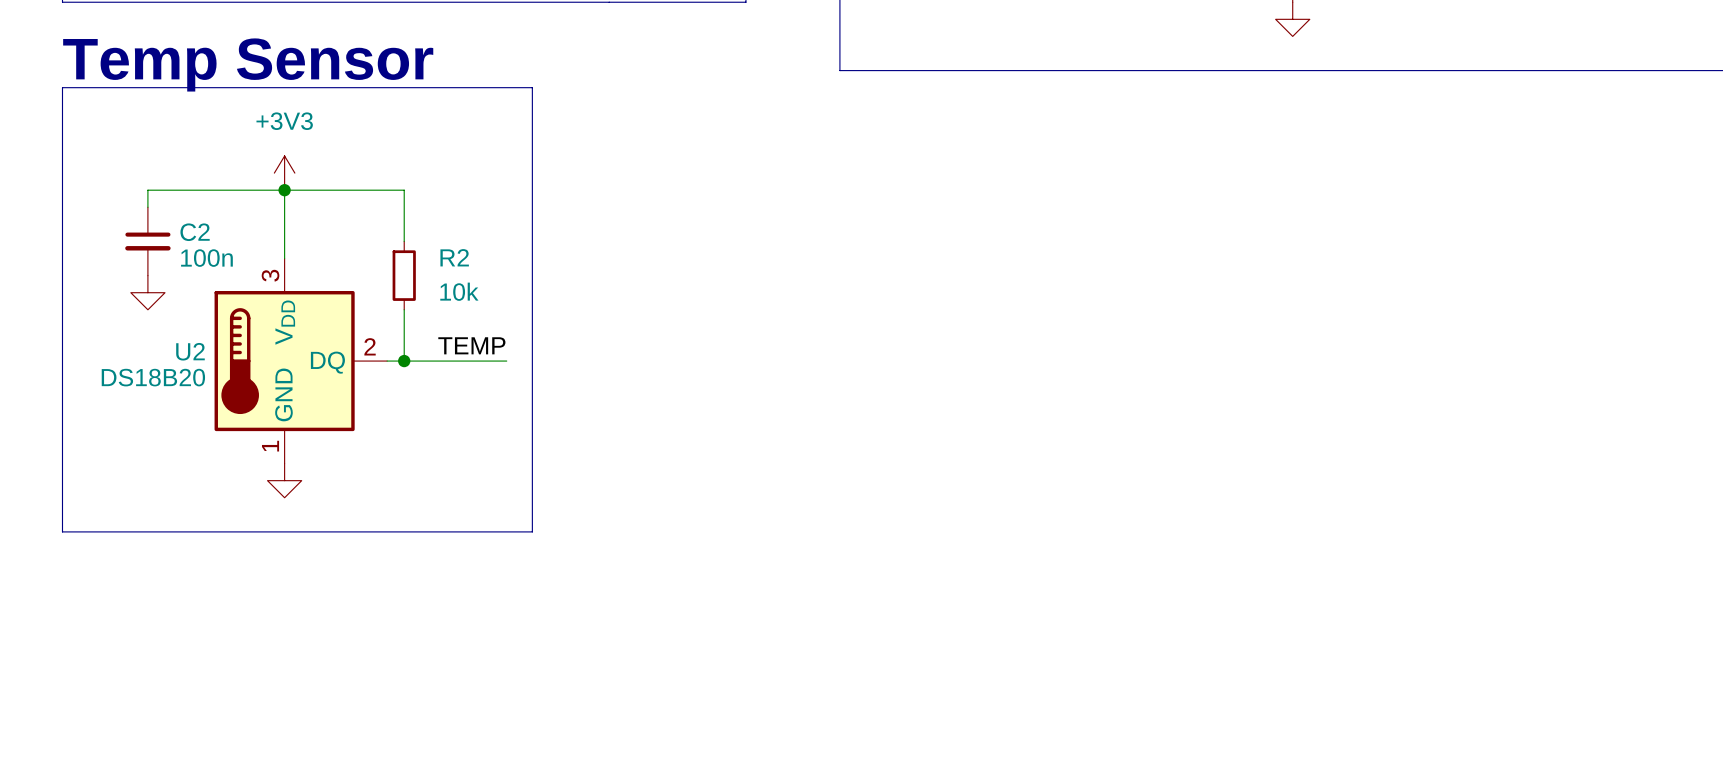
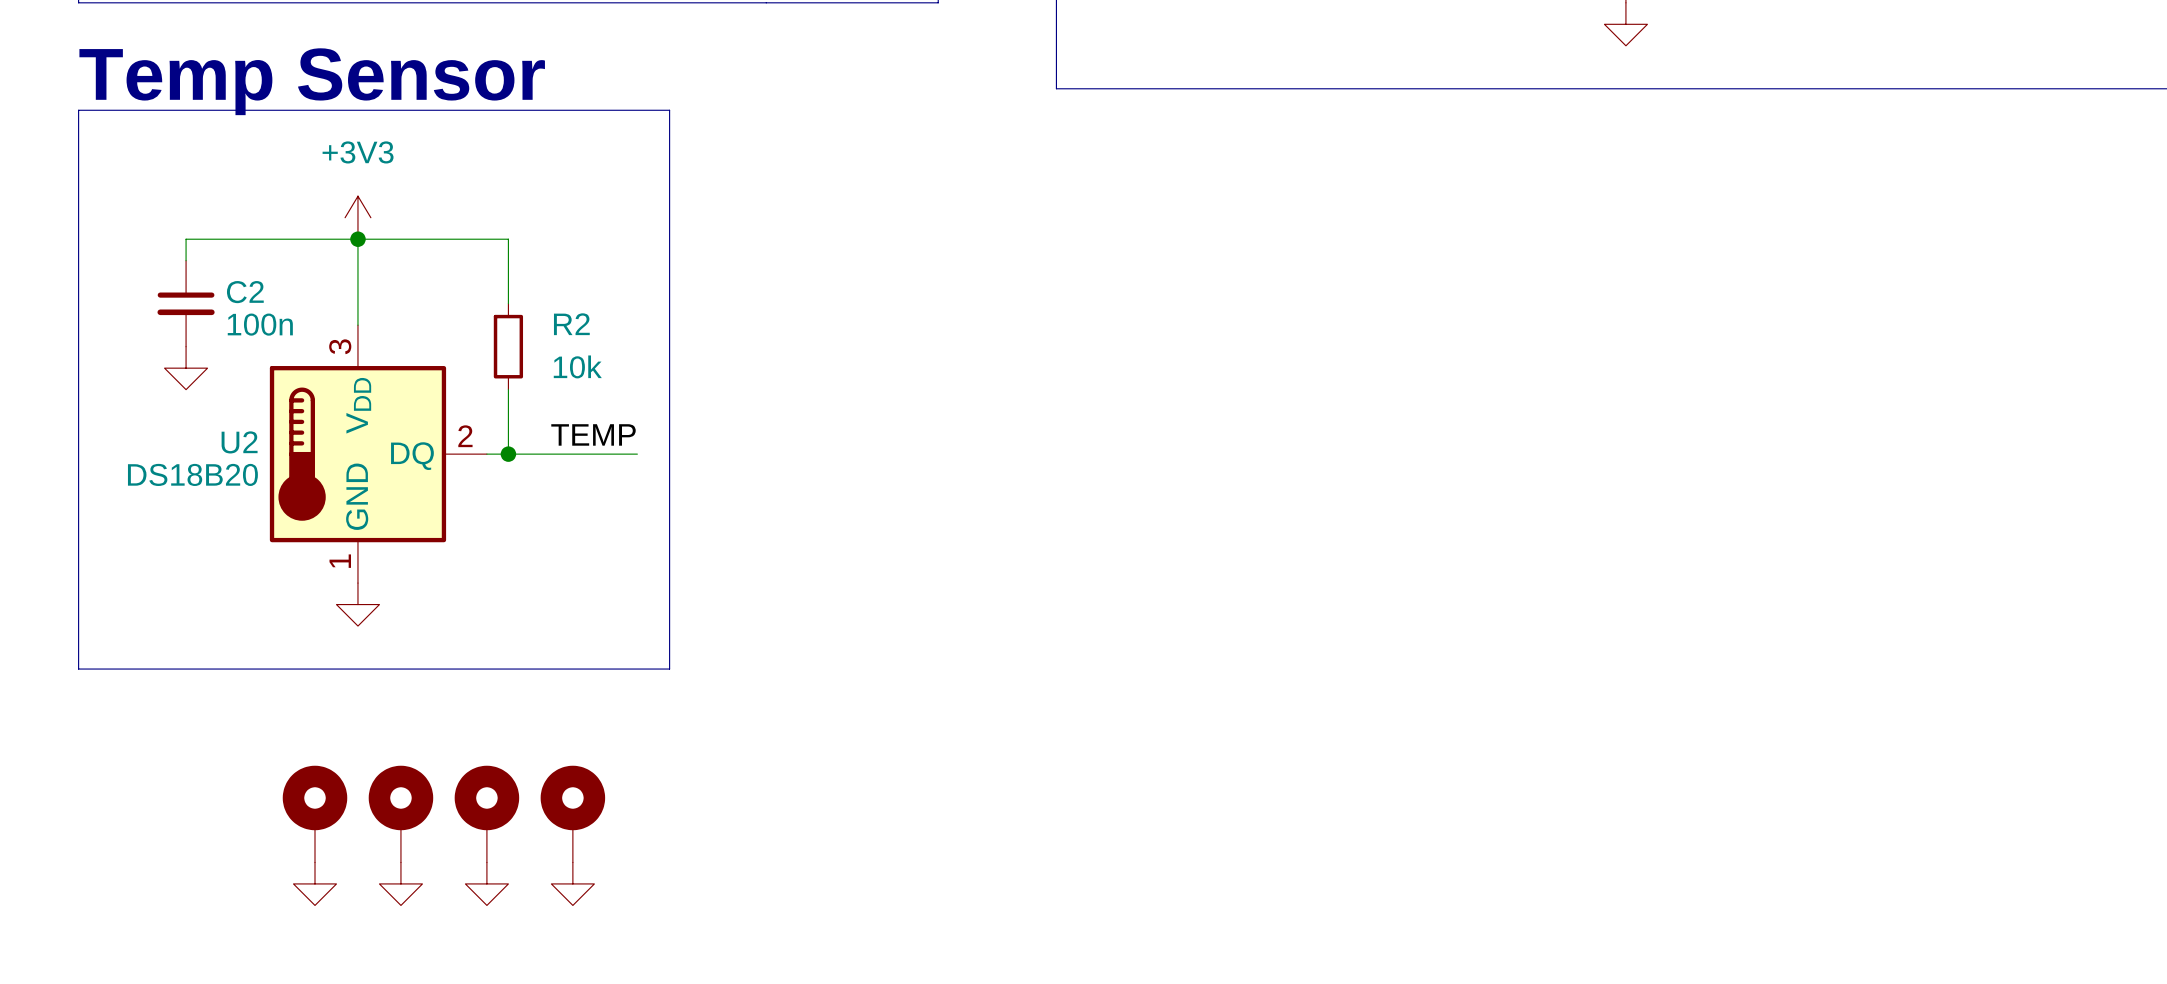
part: none -> (315, 814)
part: none -> (400, 814)
part: none -> (486, 814)
part: none -> (572, 814)
power symbol: none -> (315, 883)
power symbol: none -> (400, 883)
power symbol: none -> (486, 883)
power symbol: none -> (572, 883)

